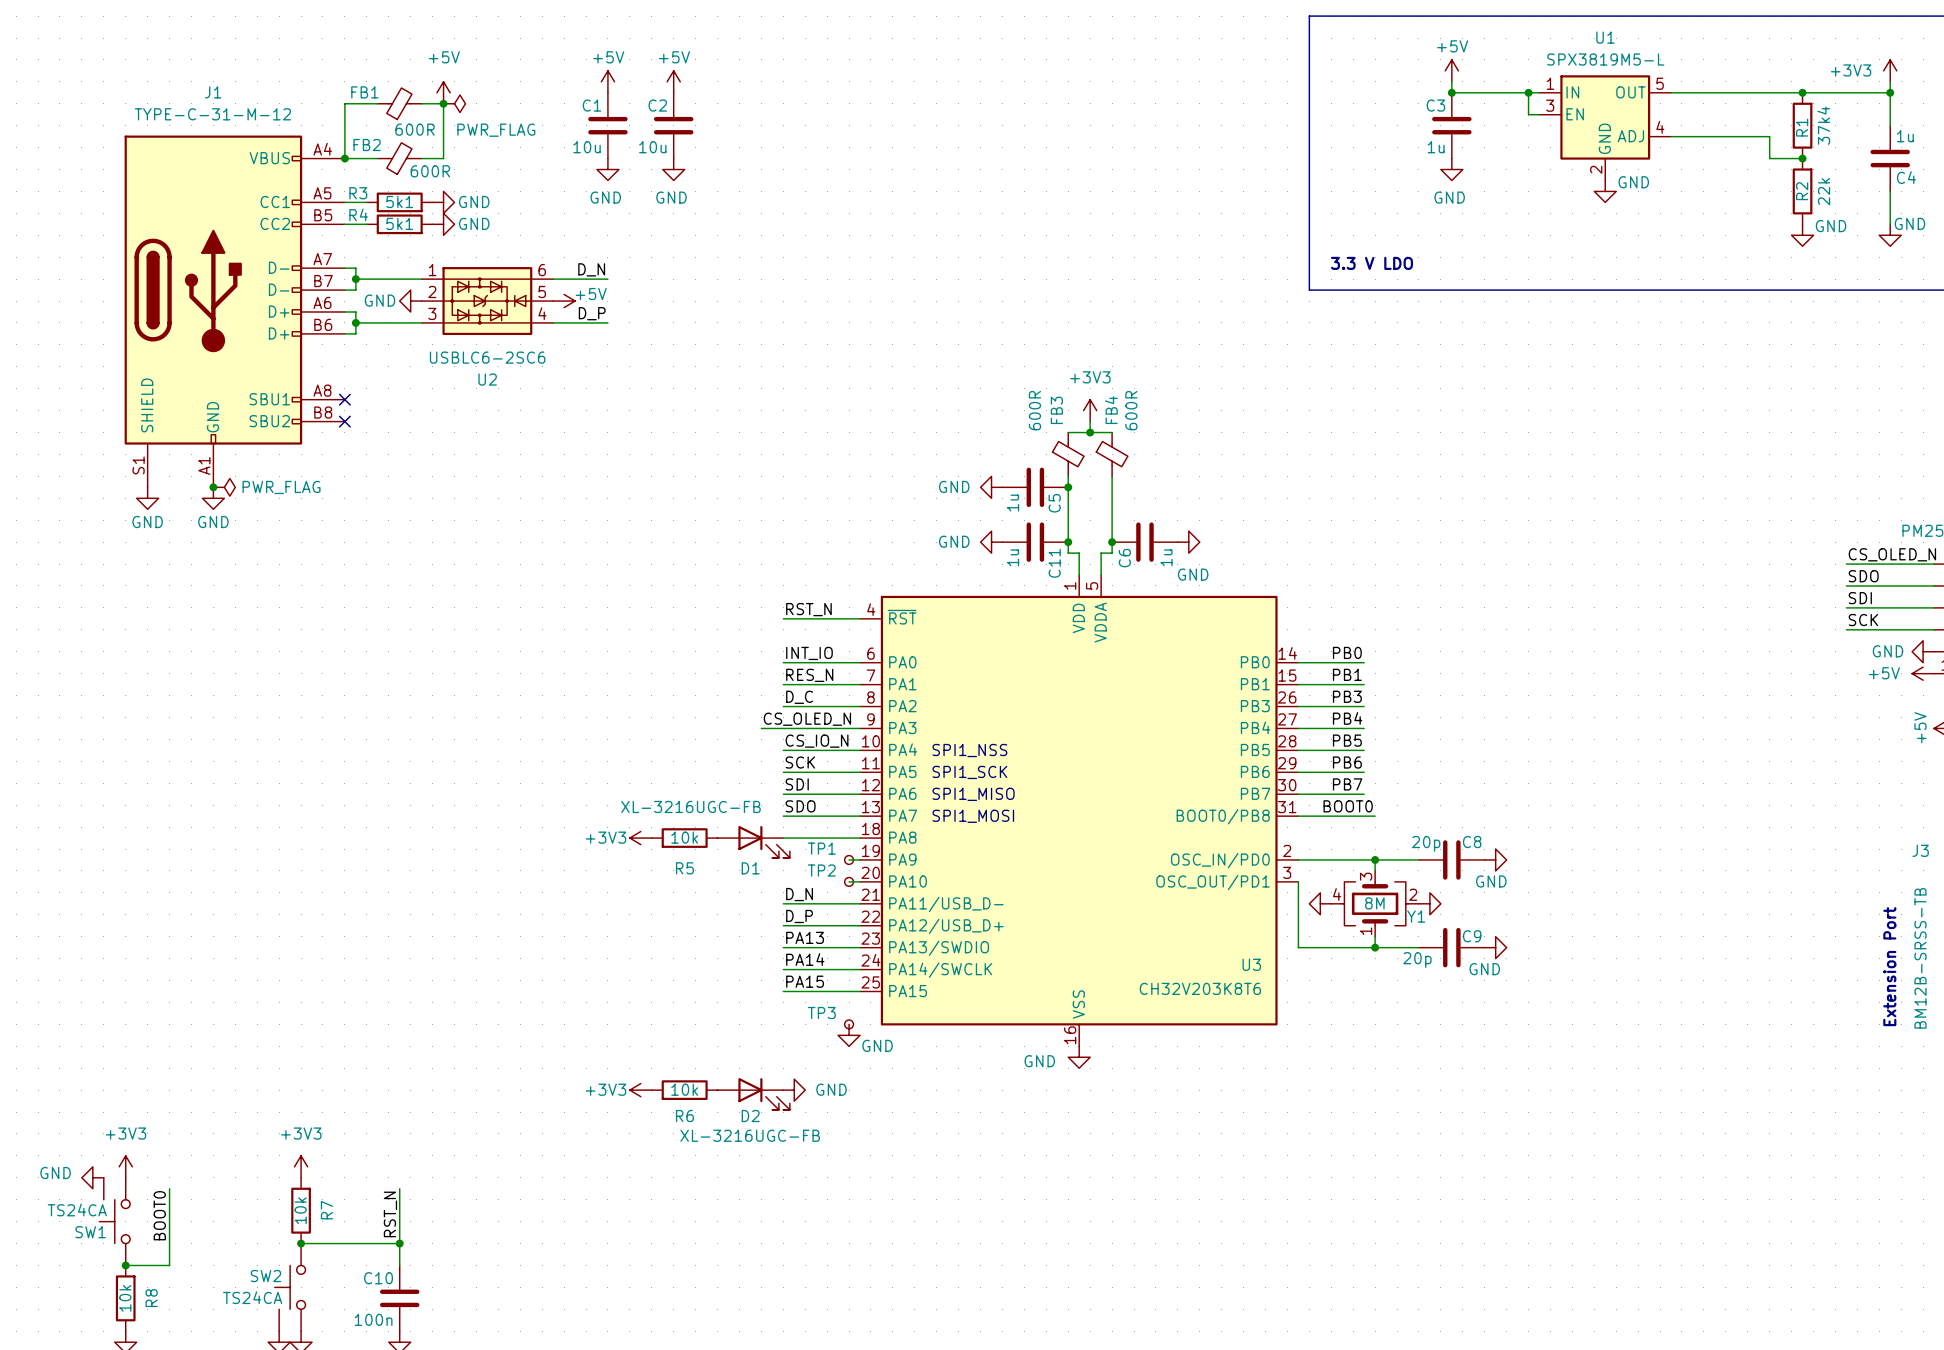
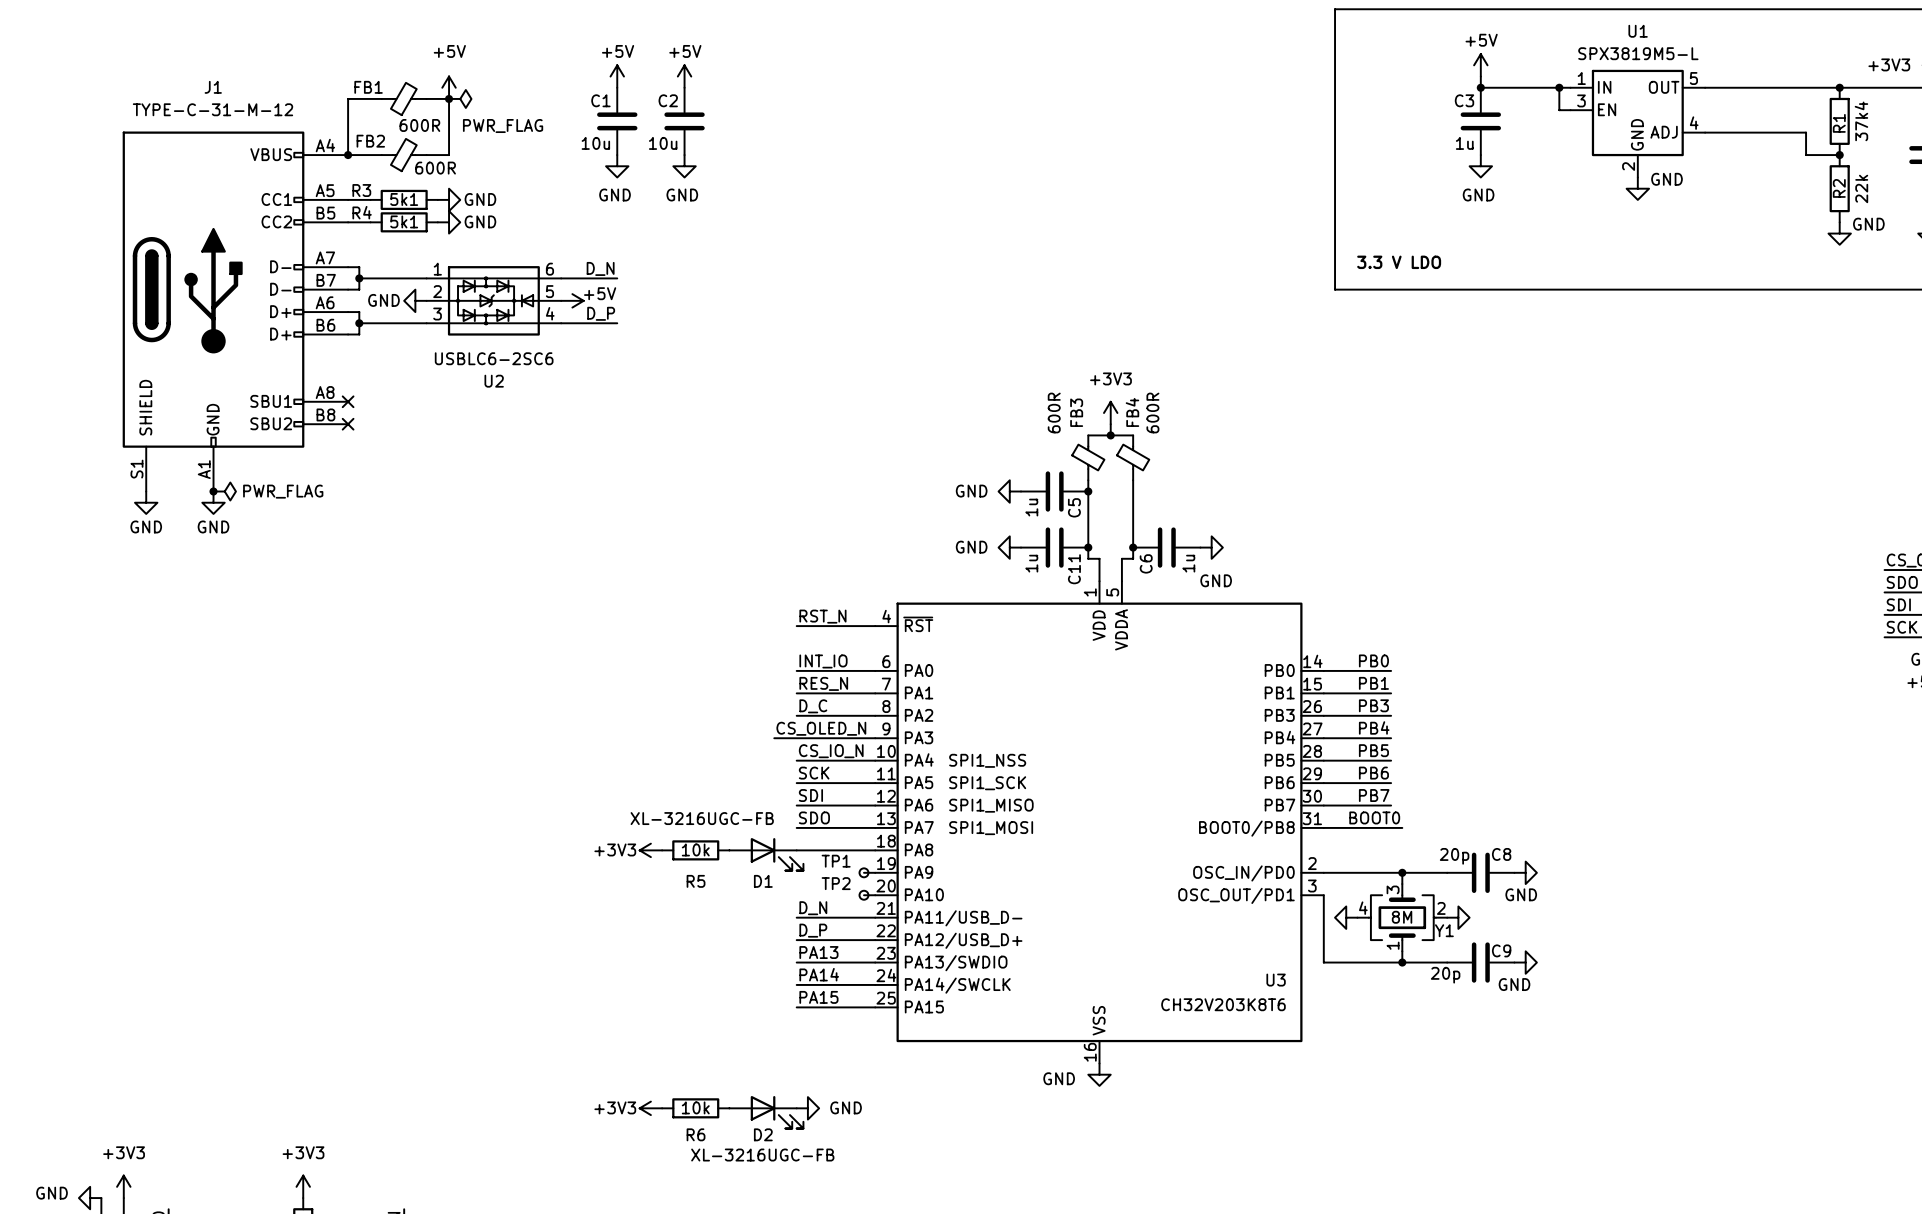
TP3: (849, 1024) -> none
power symbol: GND (849, 1035) -> none

